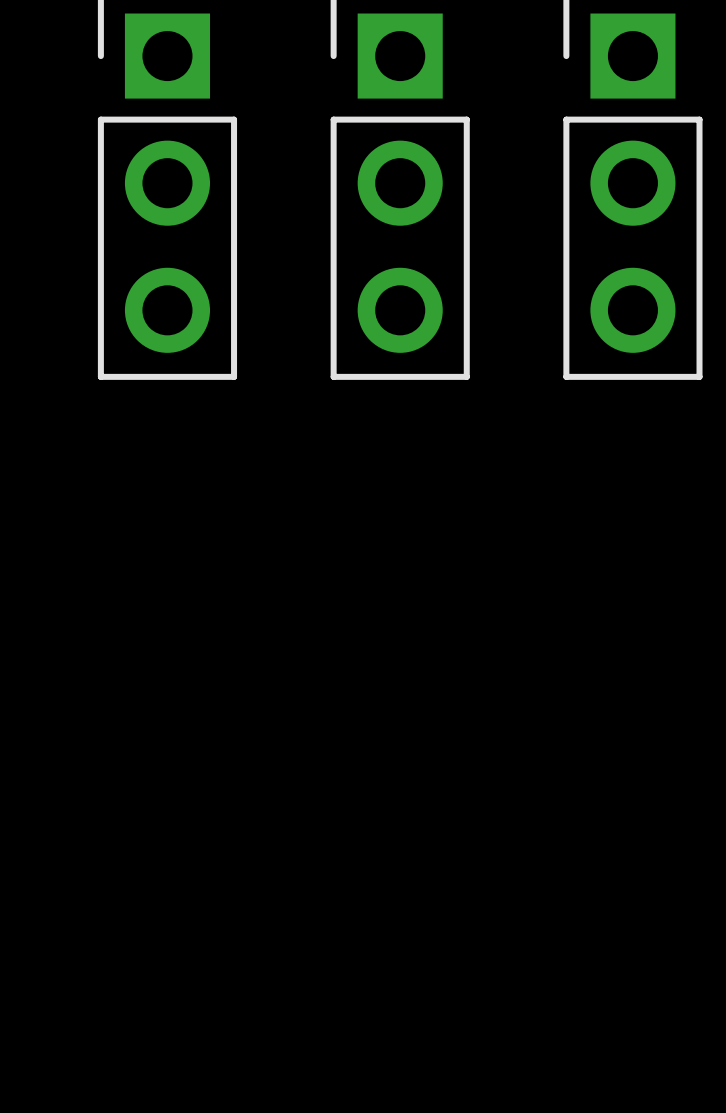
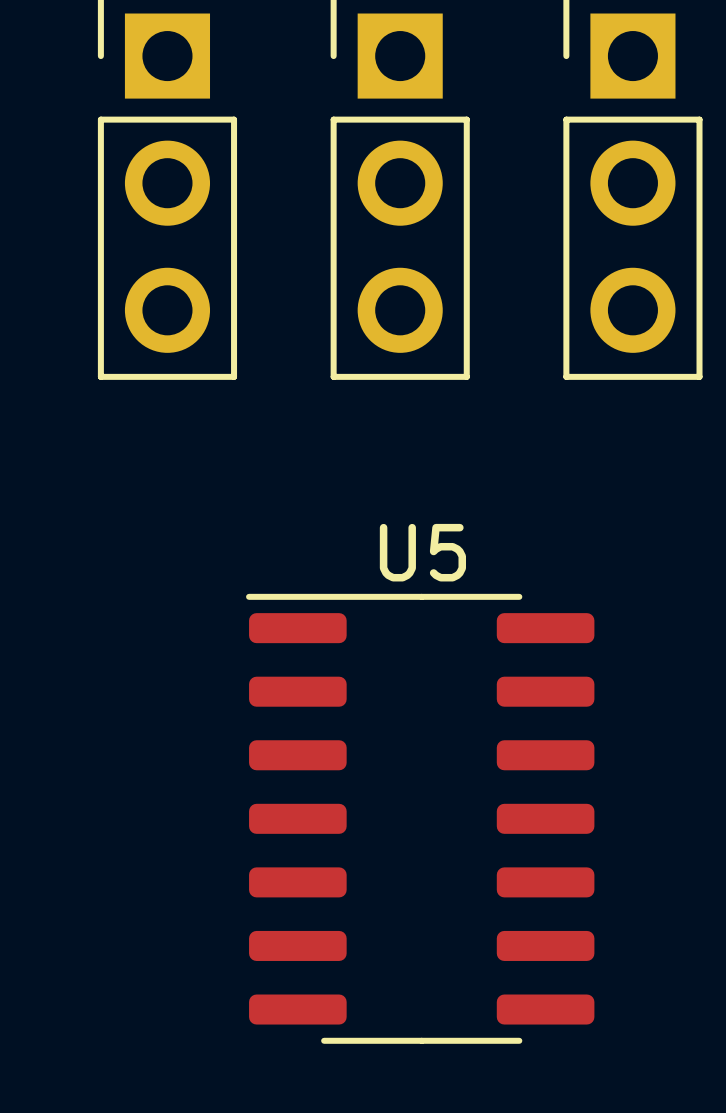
U5: none -> (420, 818)

